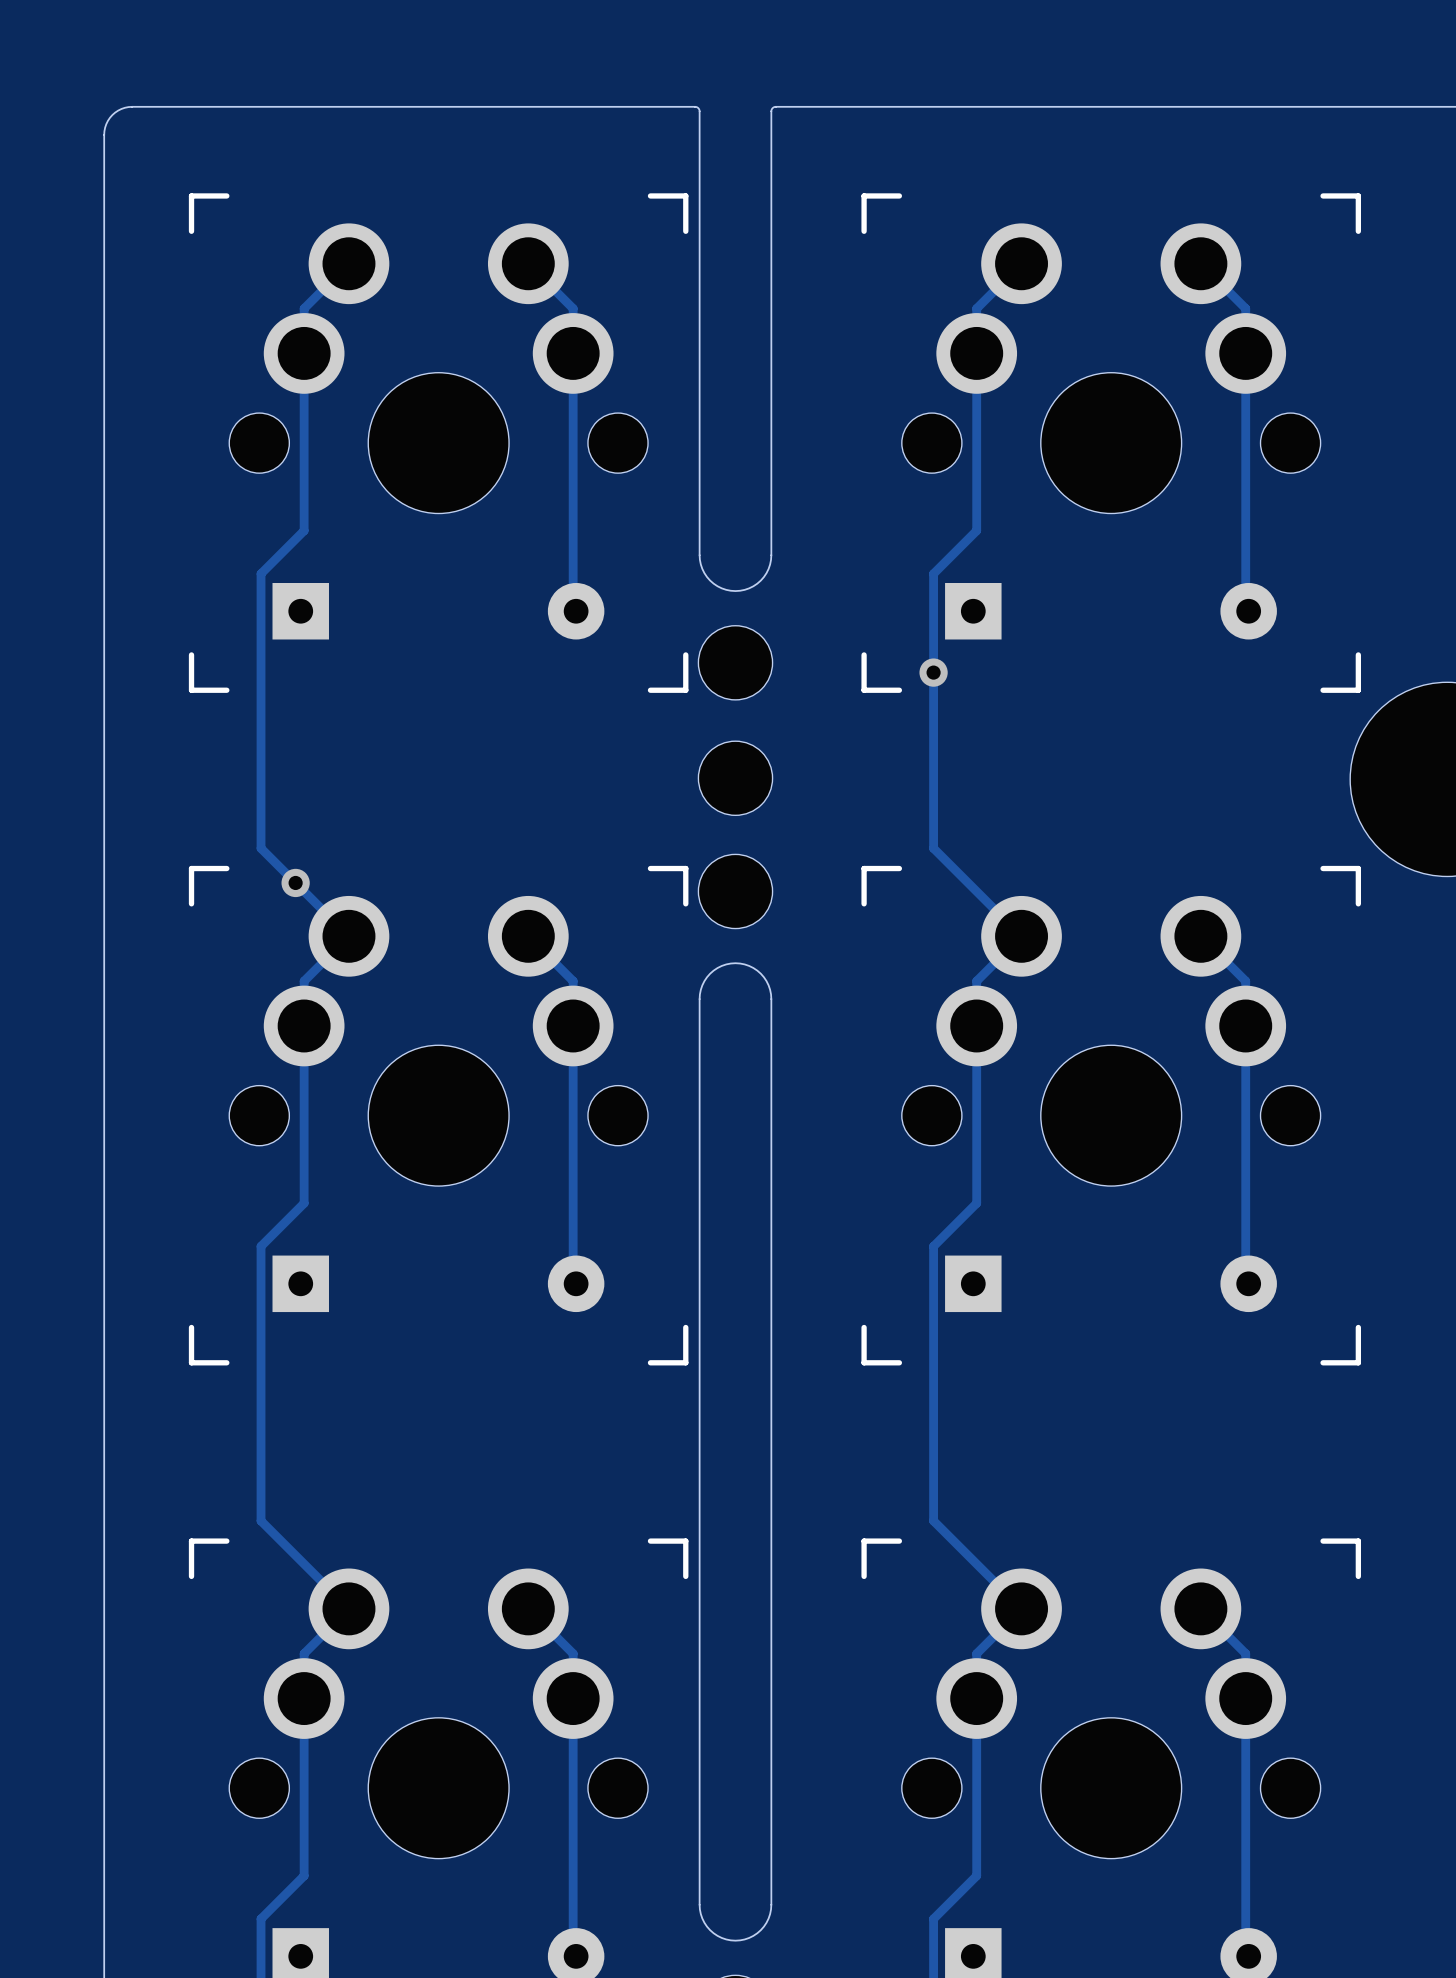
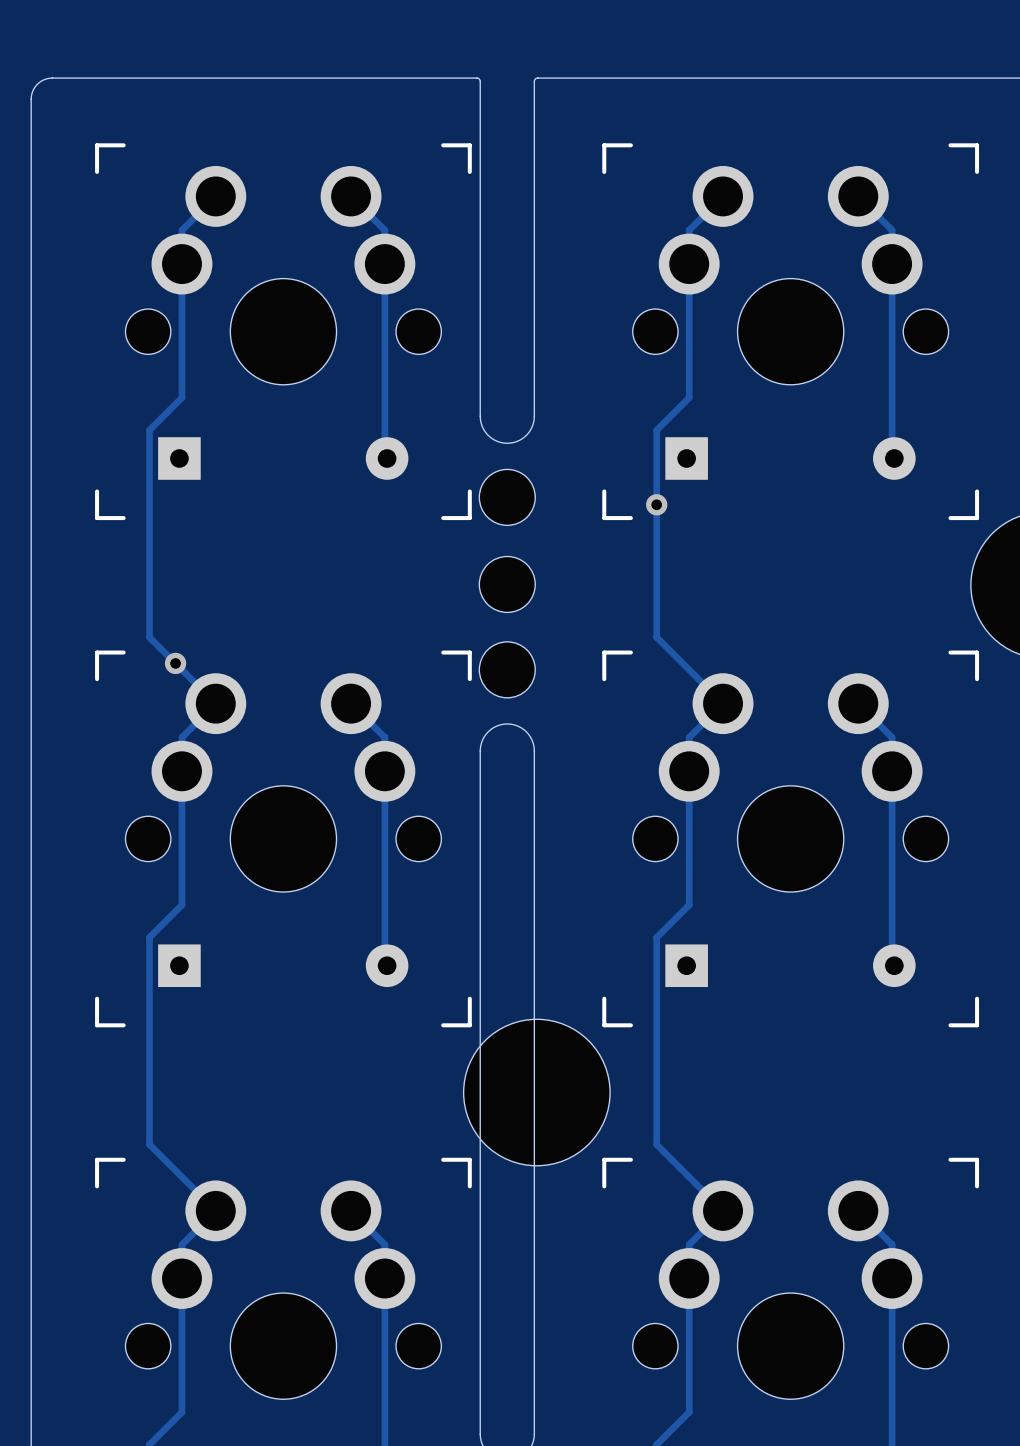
part: none -> (536, 1092)

